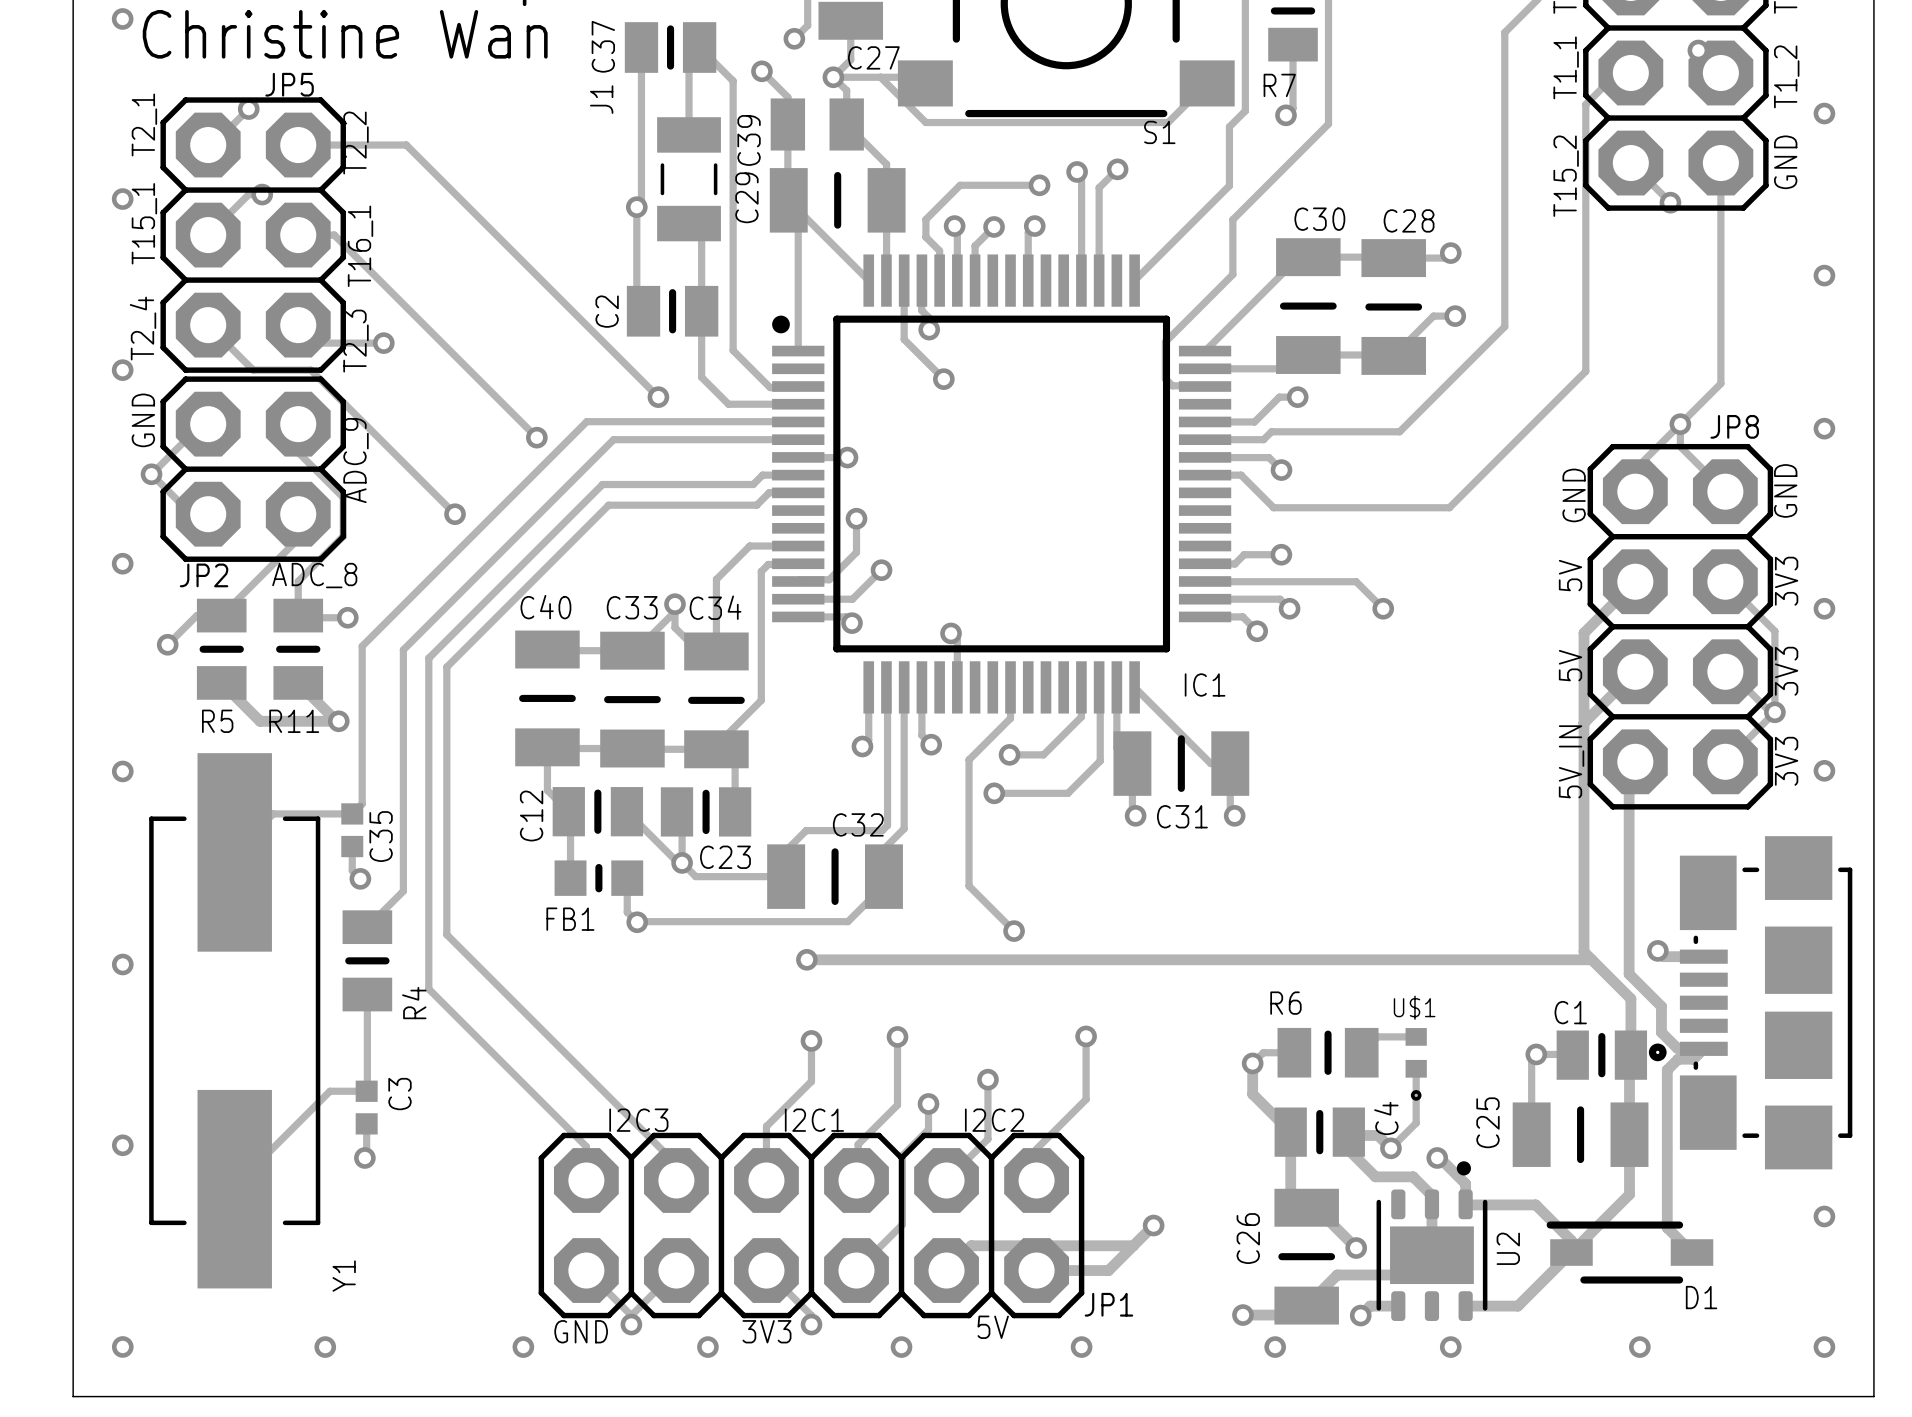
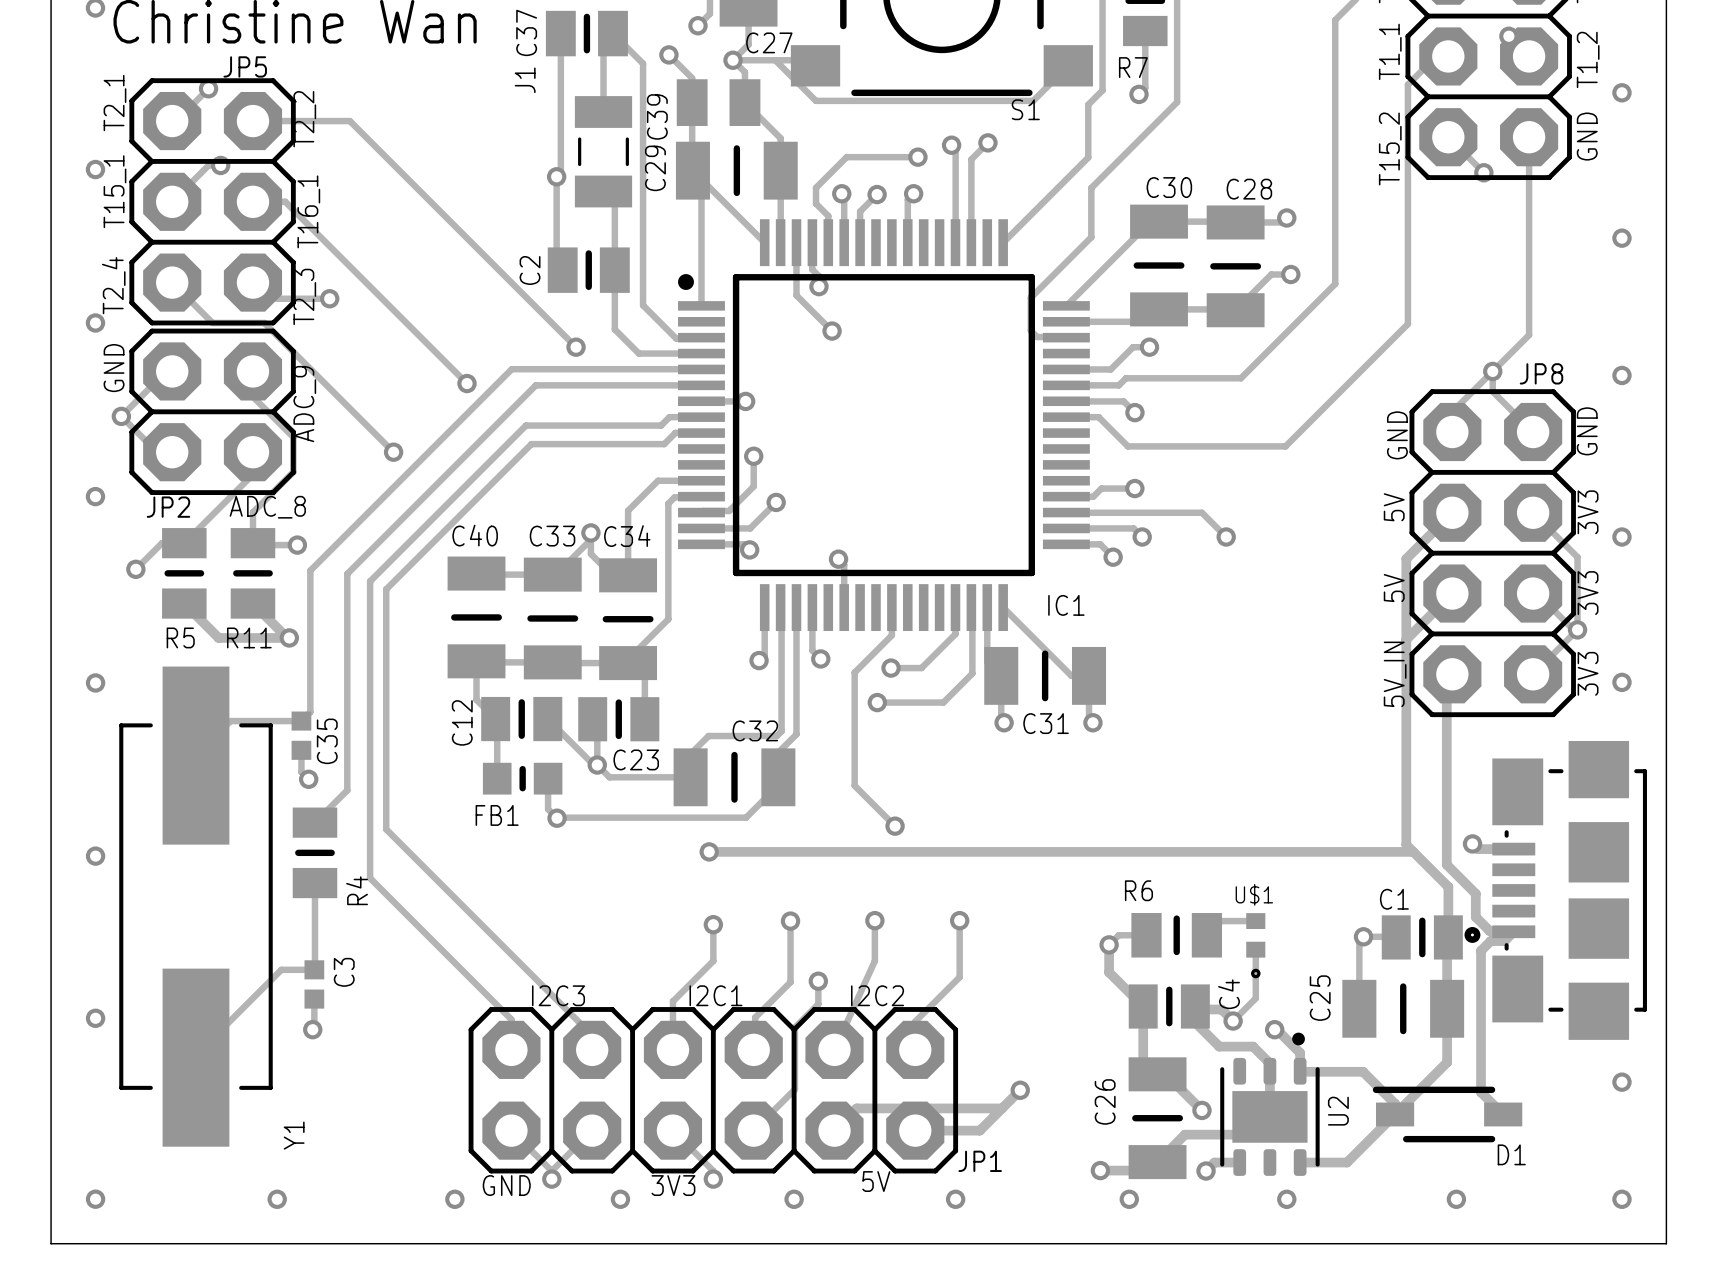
track: (987, 1079) (987, 1139) (946, 1180) -> (874, 920) (874, 961) (834, 1049)
via position: (987, 1079) -> (874, 920)

